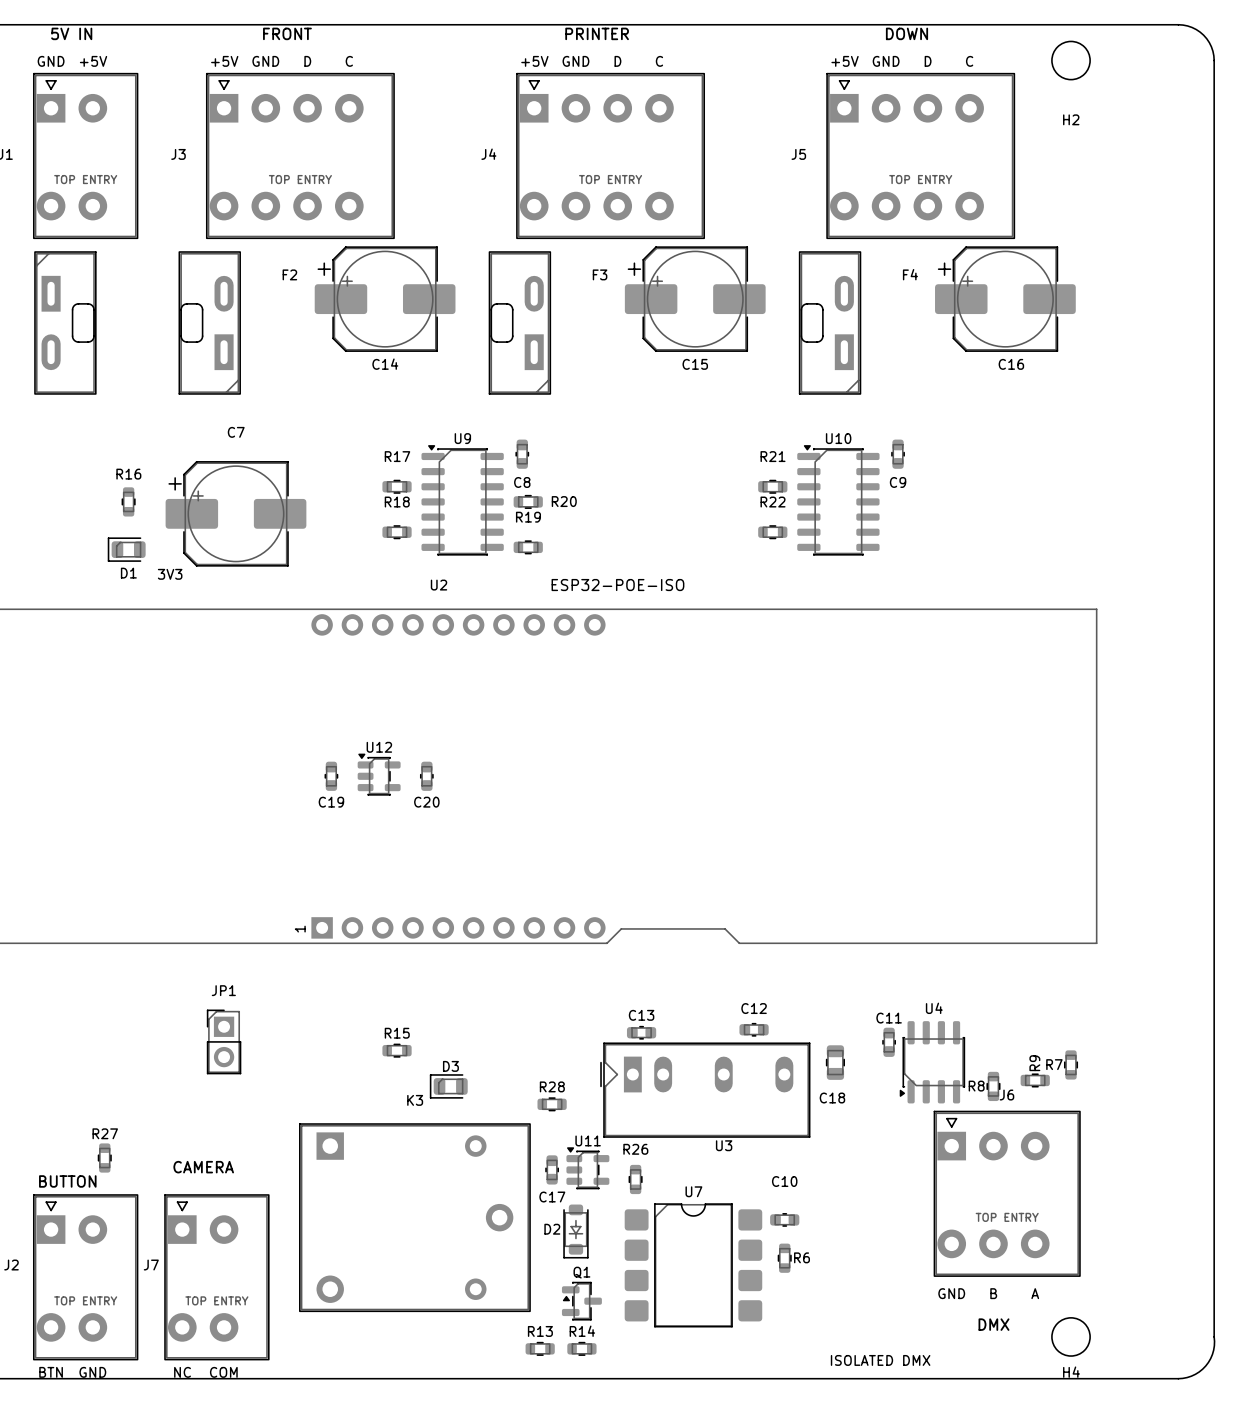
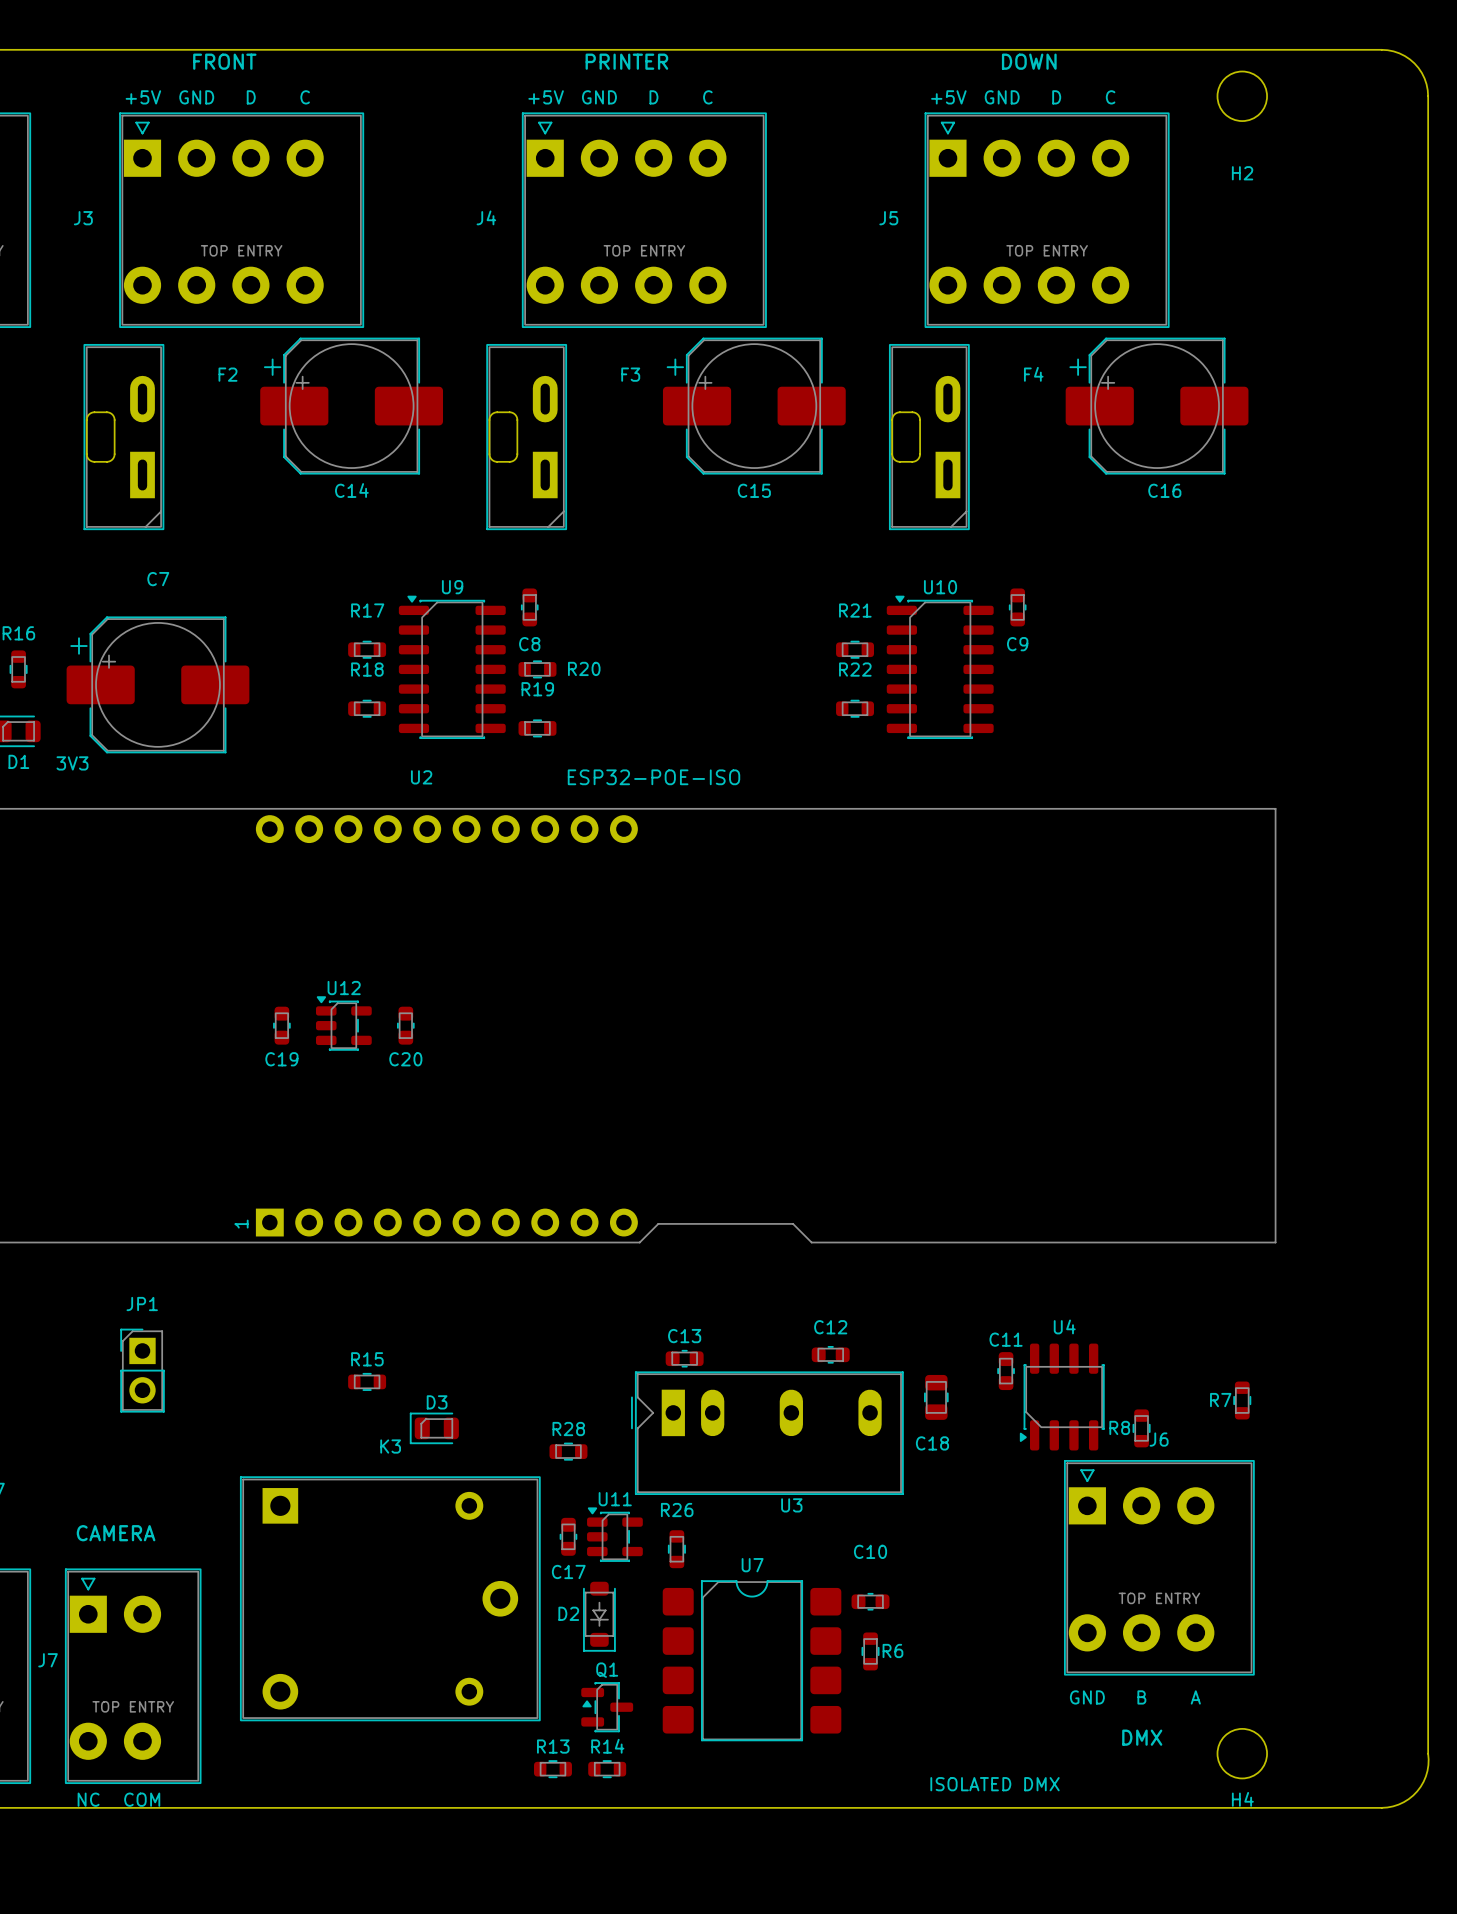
R9: (1035, 1080) -> none

